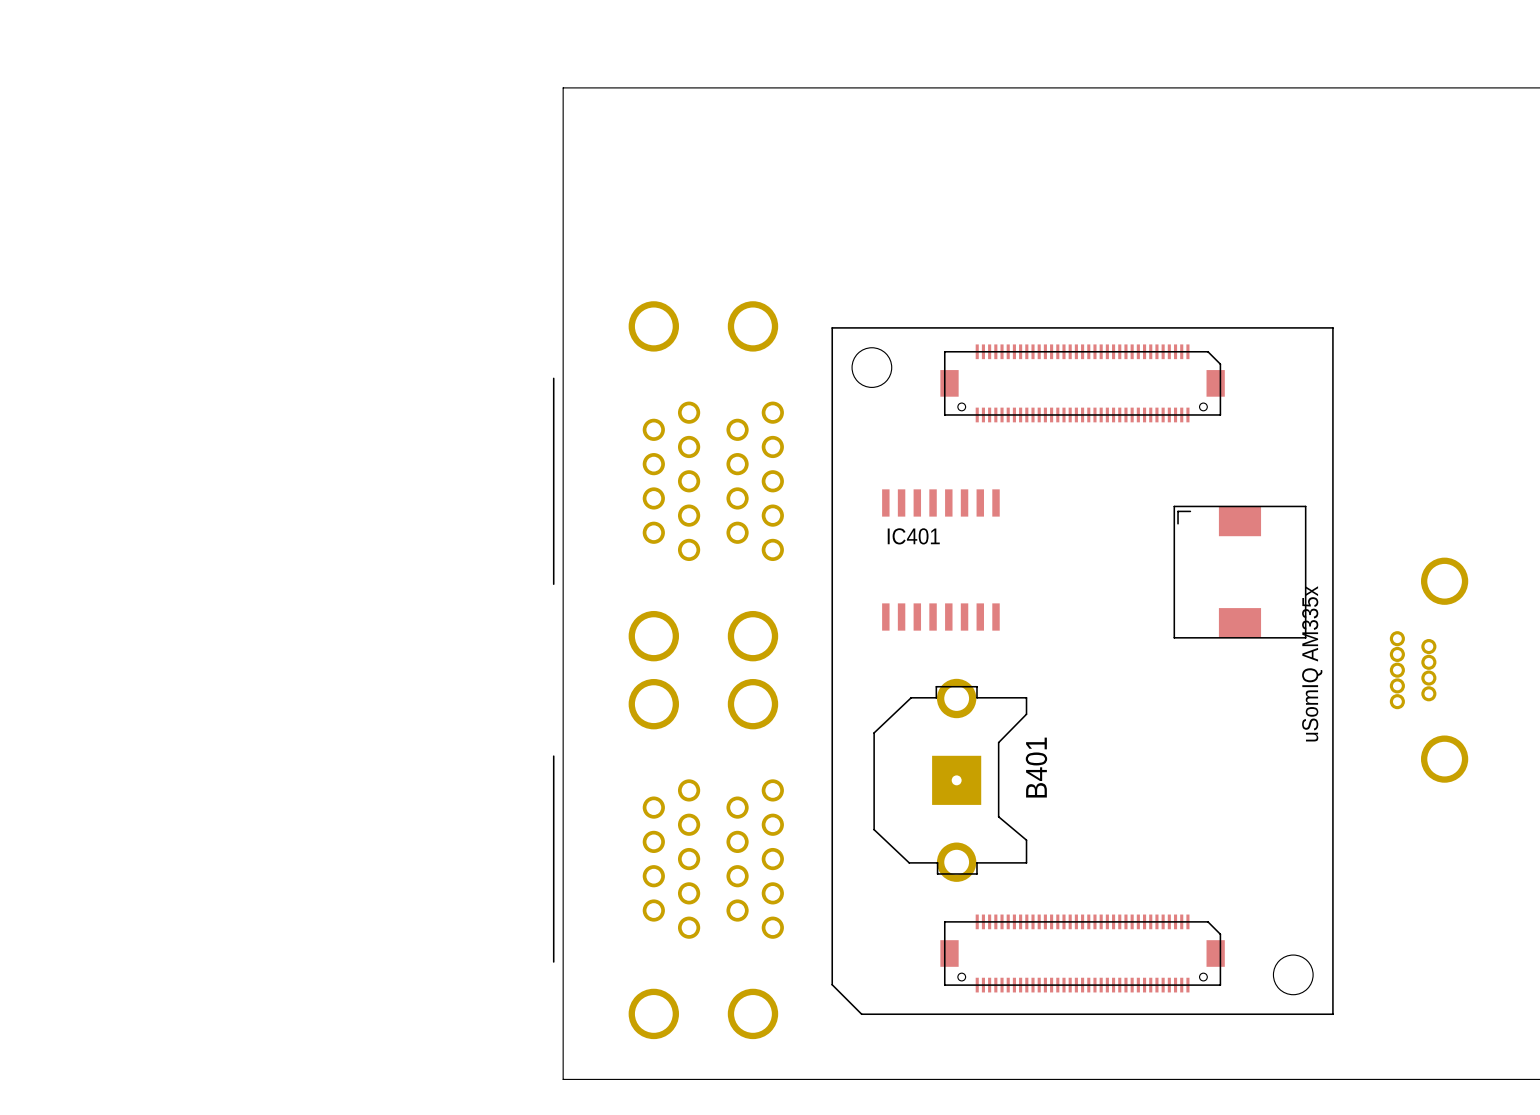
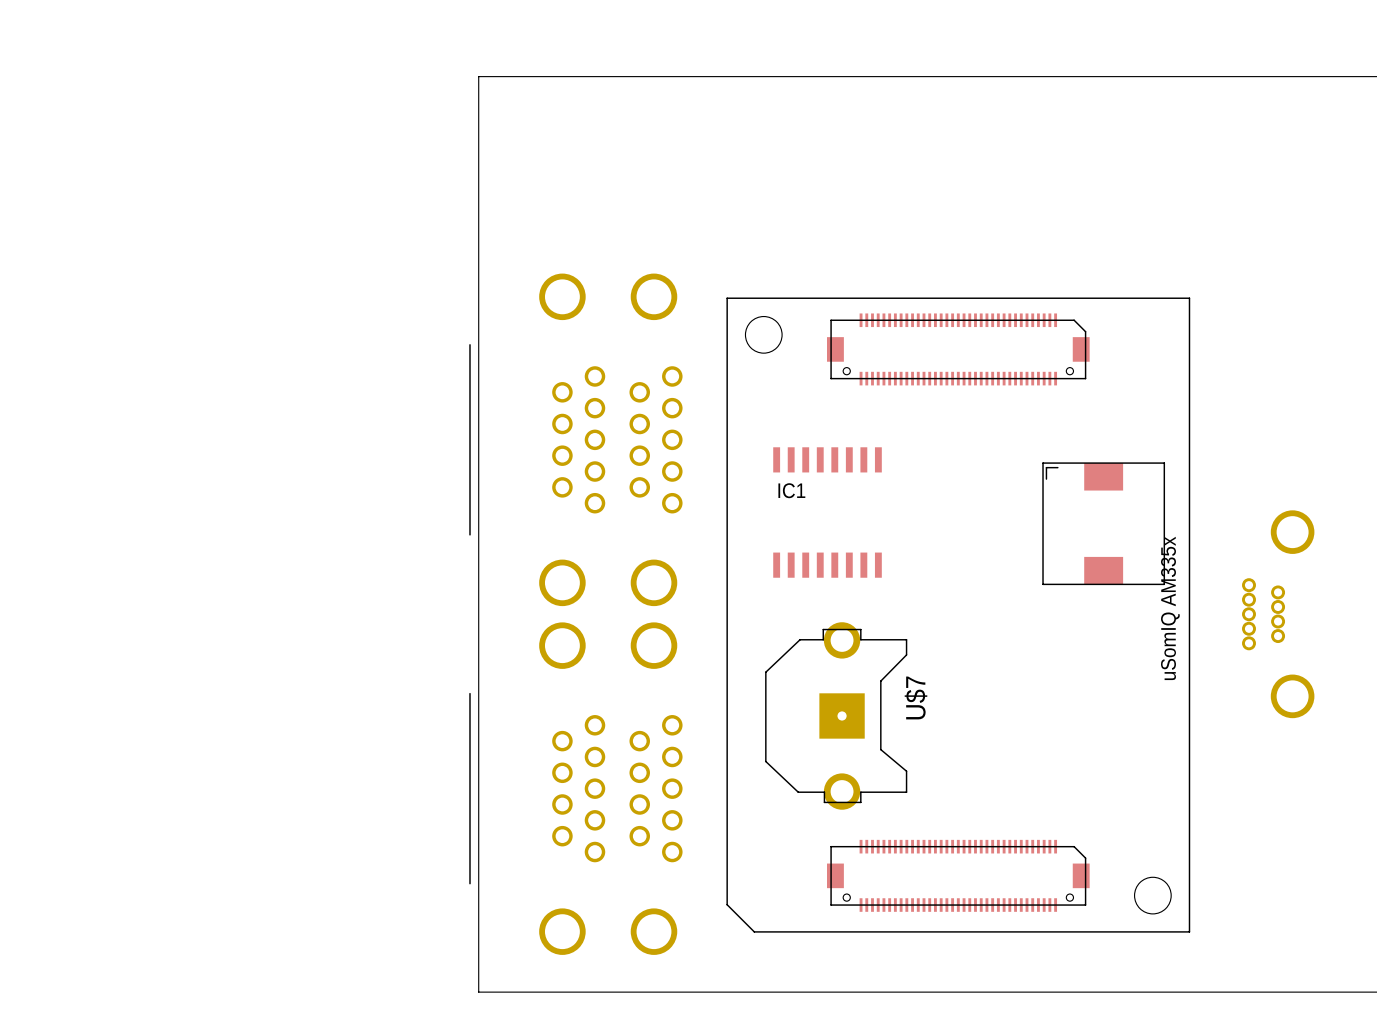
IC401 name: IC401 (913, 536) -> IC1 (791, 490)
B401 name: B401 (1036, 767) -> U$7 (915, 697)

